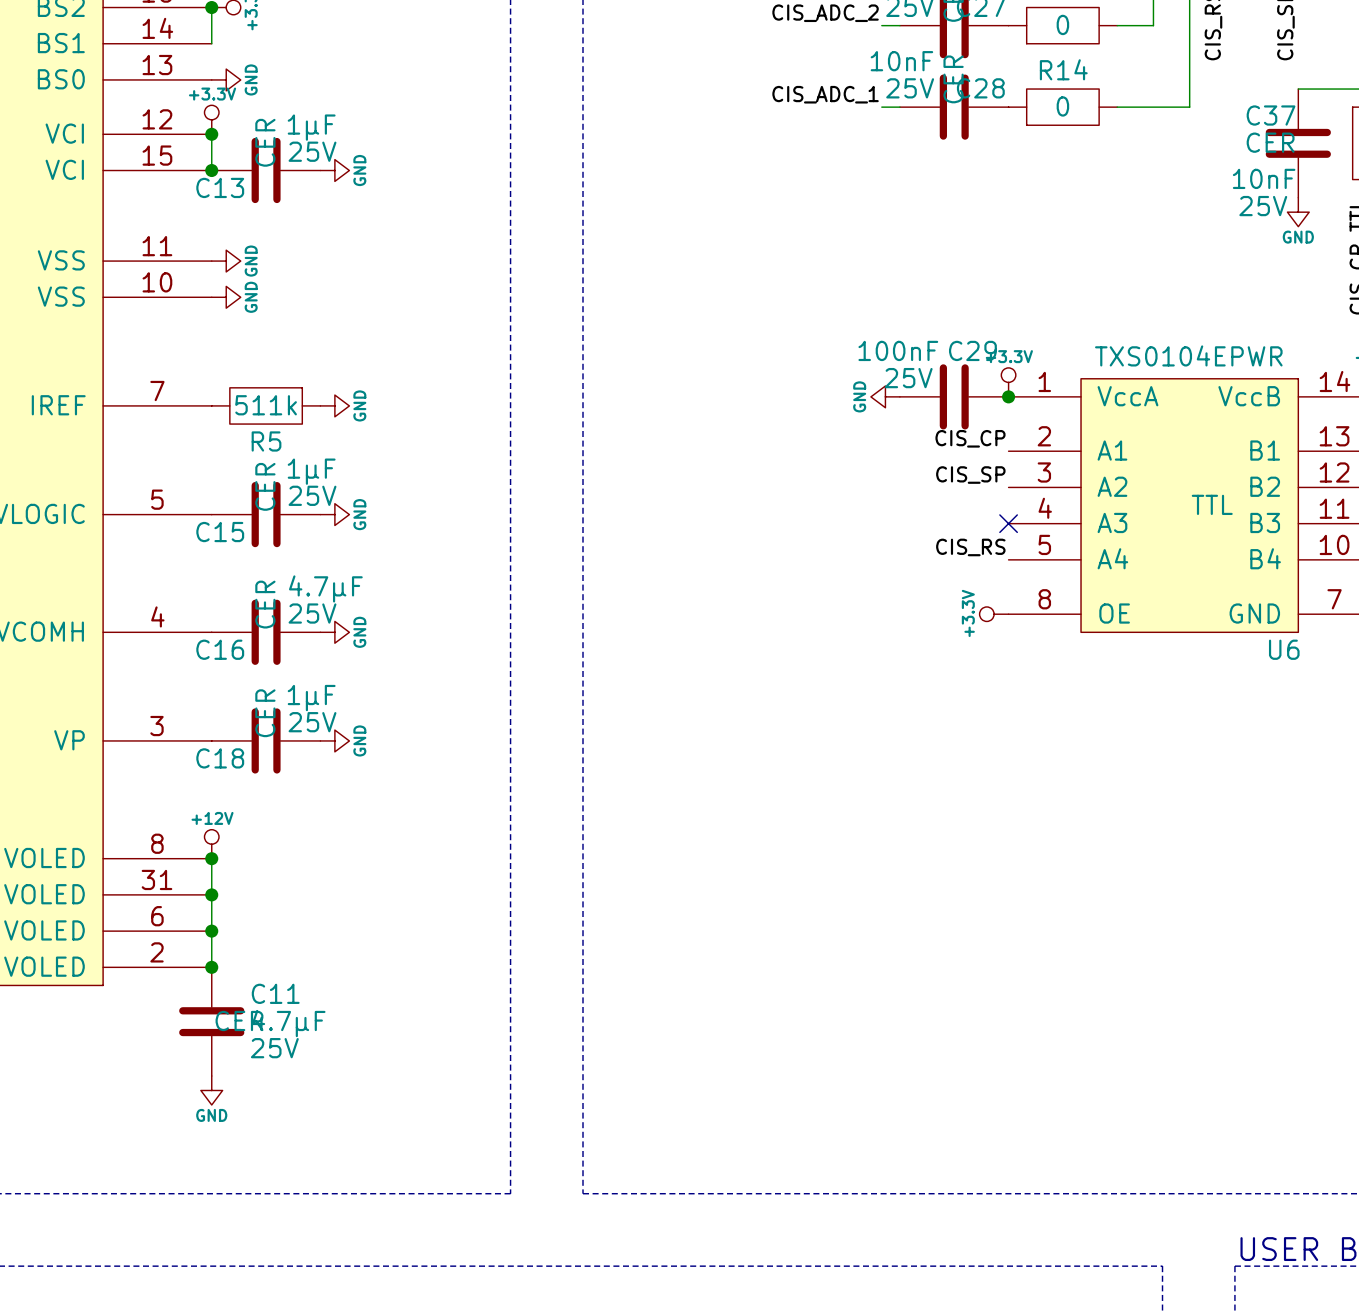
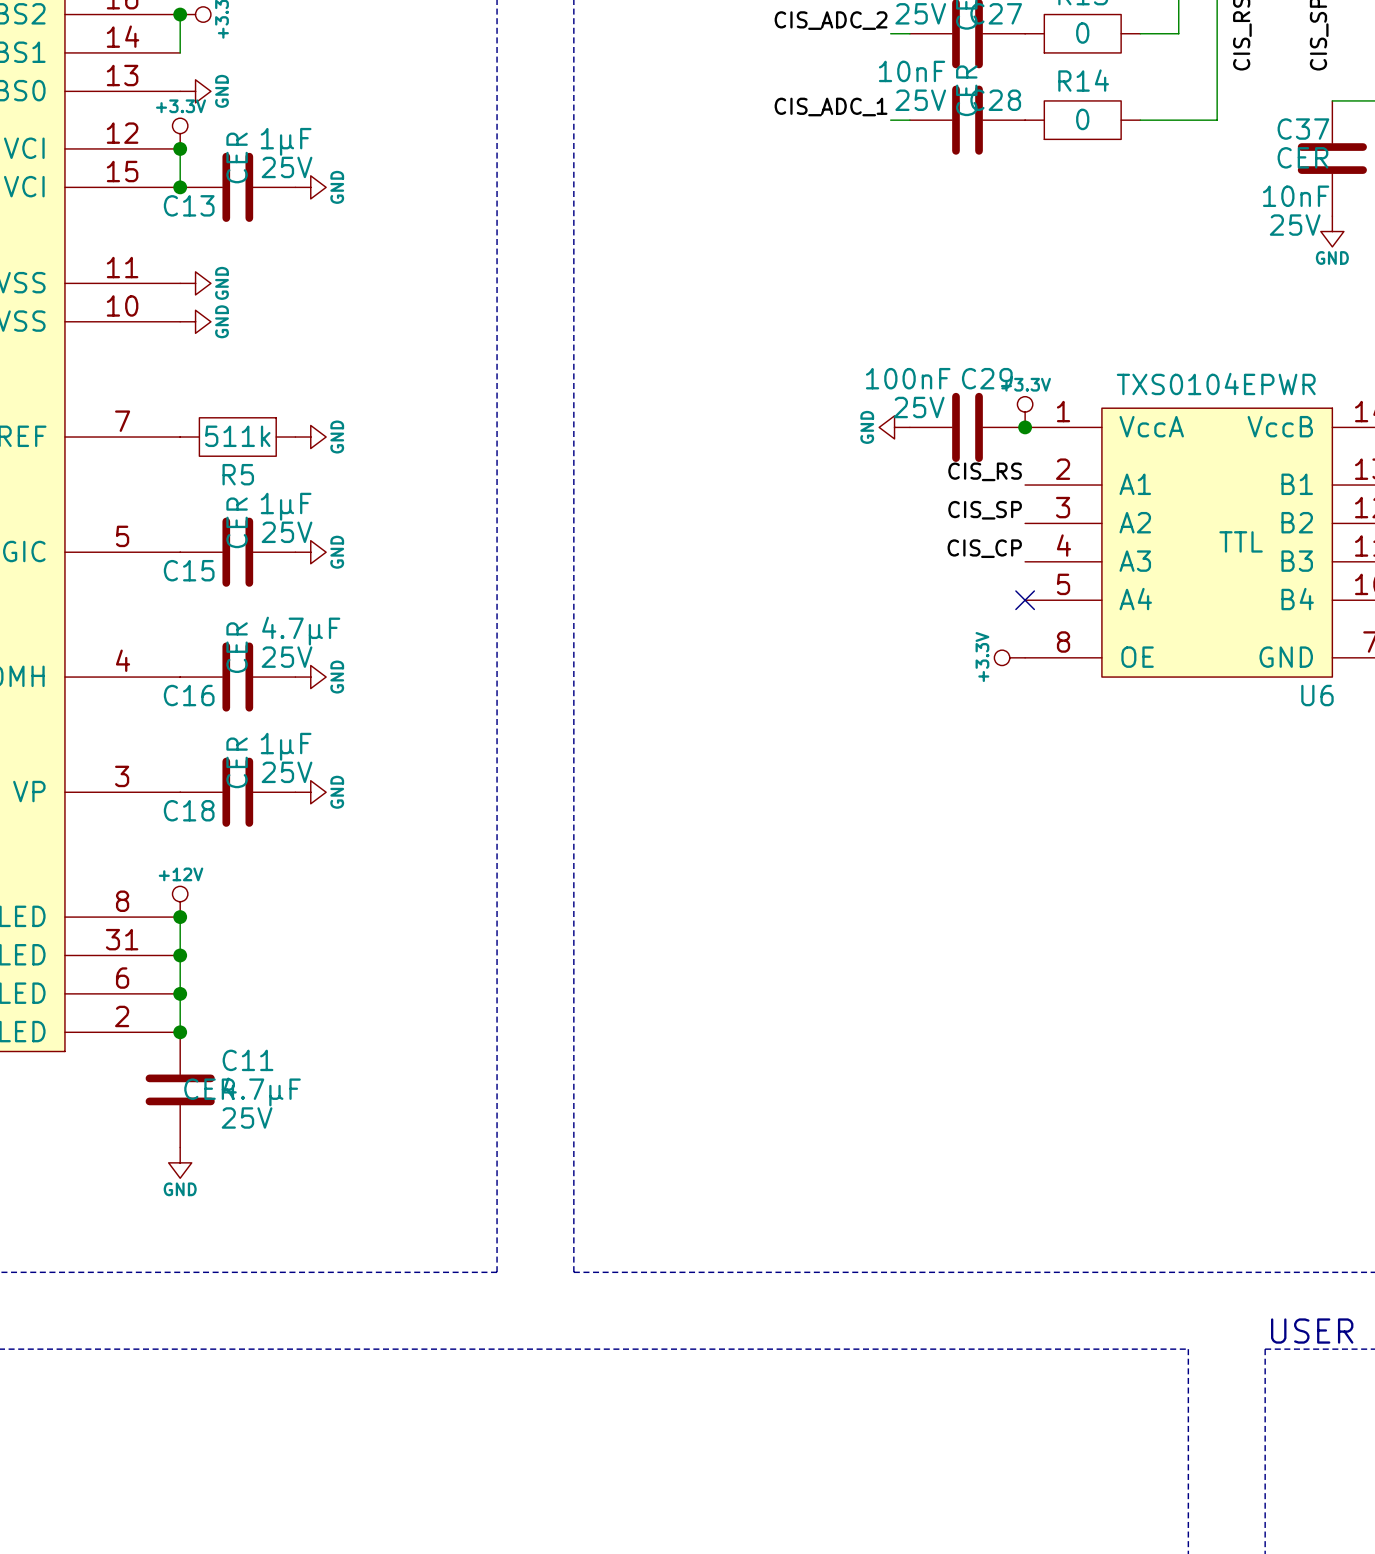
label: CIS_CP (970, 438) -> CIS_RS (985, 471)
label: none -> CIS_CP (984, 548)
no-connect mark position: (1008, 523) -> (1025, 600)
label: CIS_RS (970, 547) -> none

